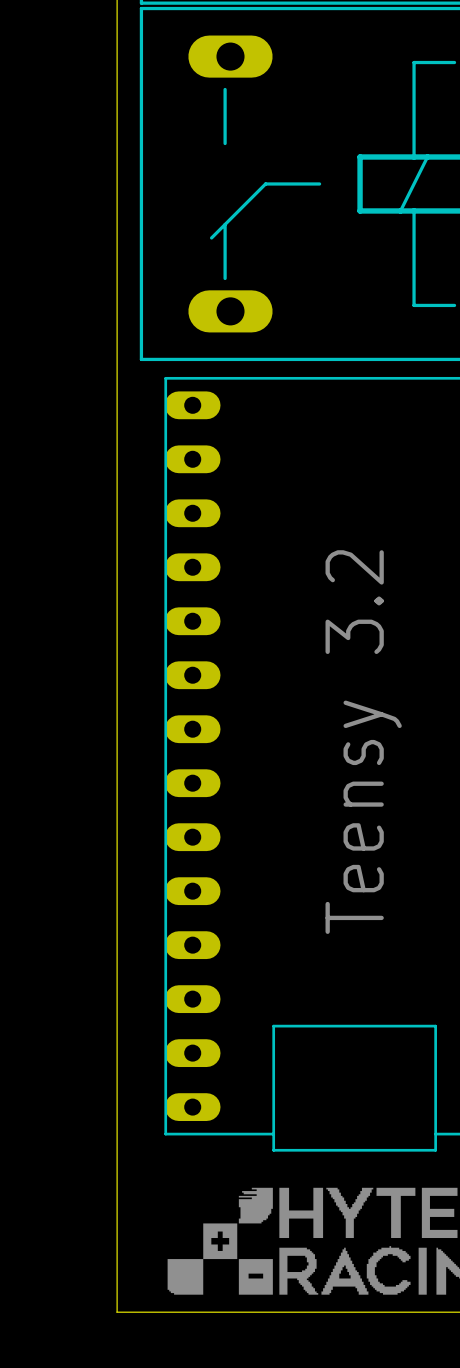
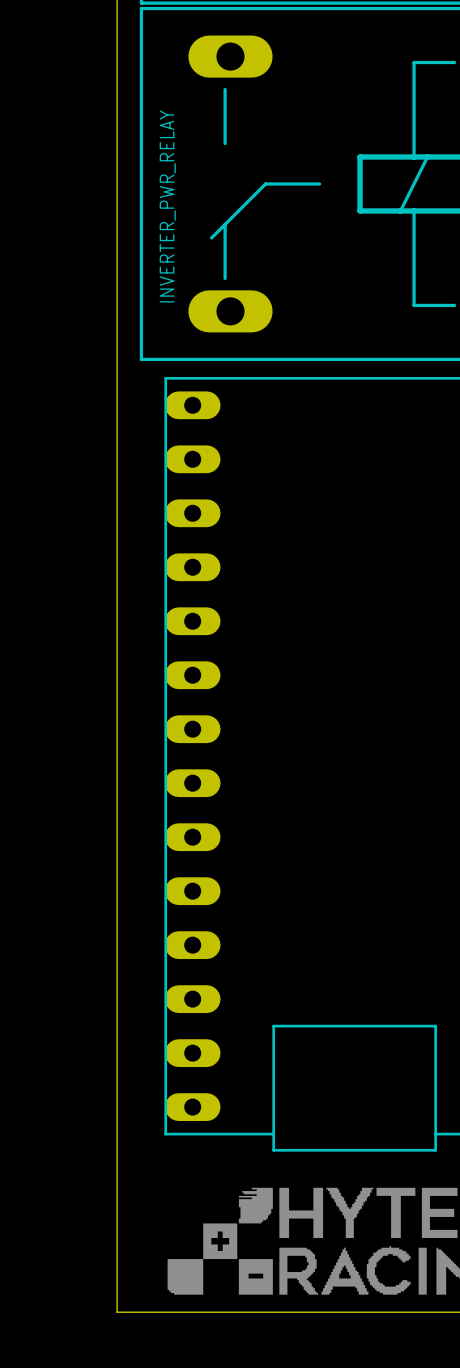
INVERTER_PWR_RELAY name: none -> INVERTER_PWR_RELAY (167, 206)
part text: Teensy 3.2 (363, 742) -> none

